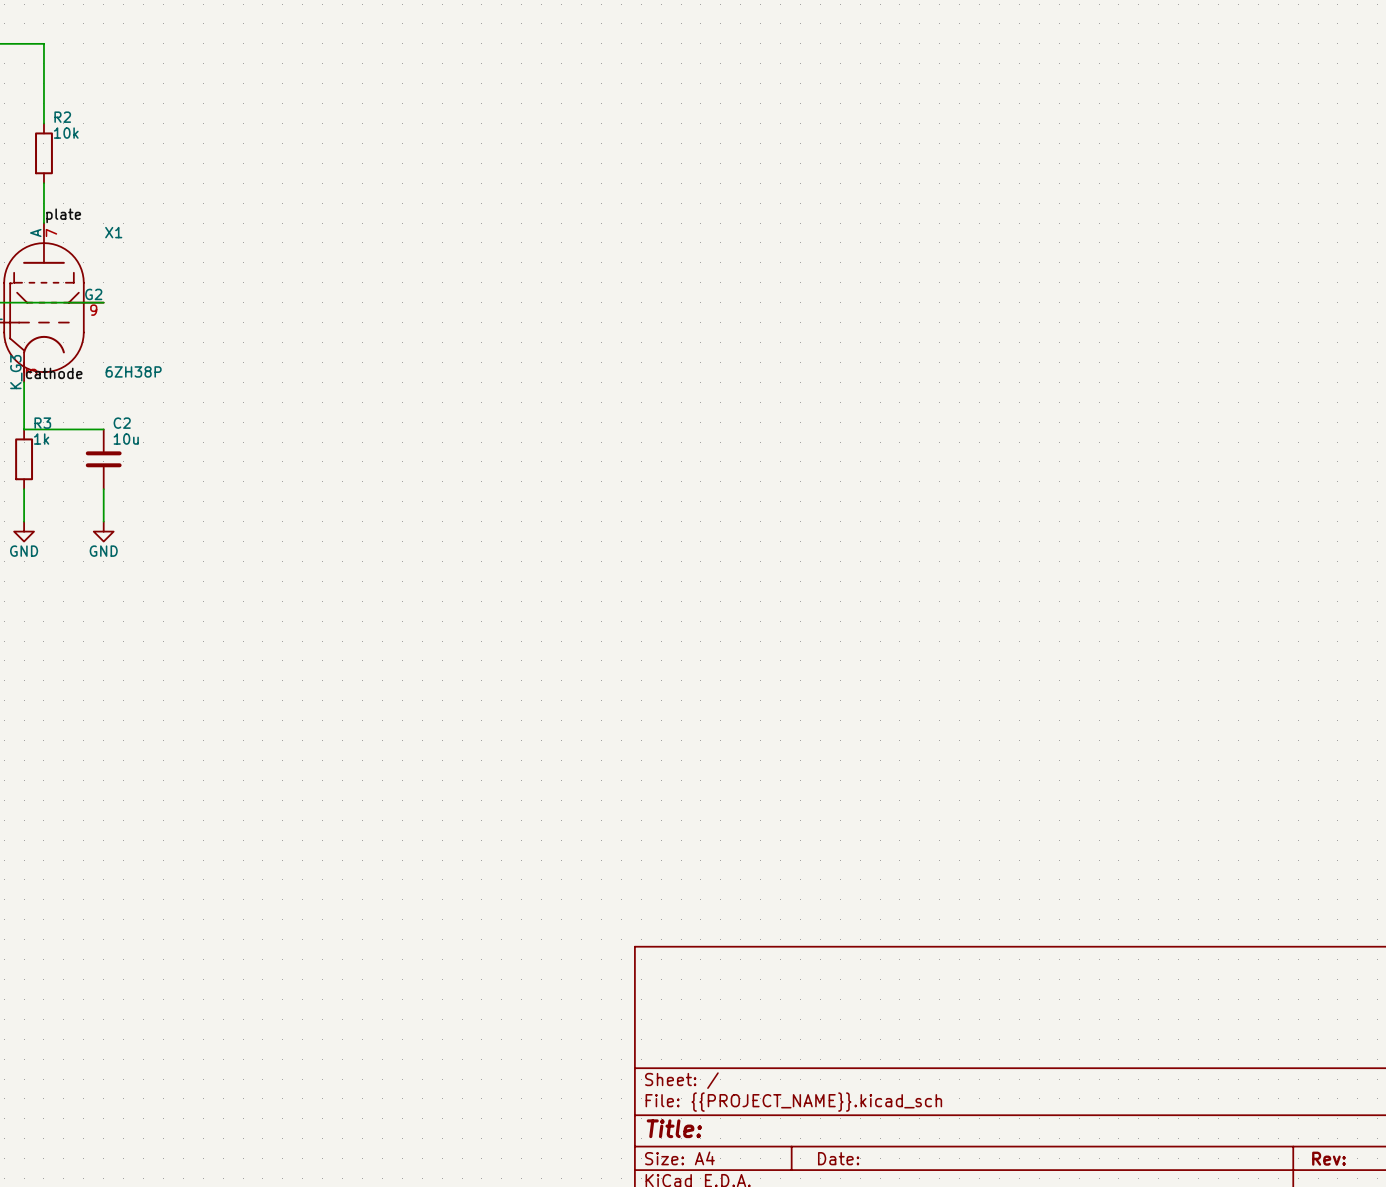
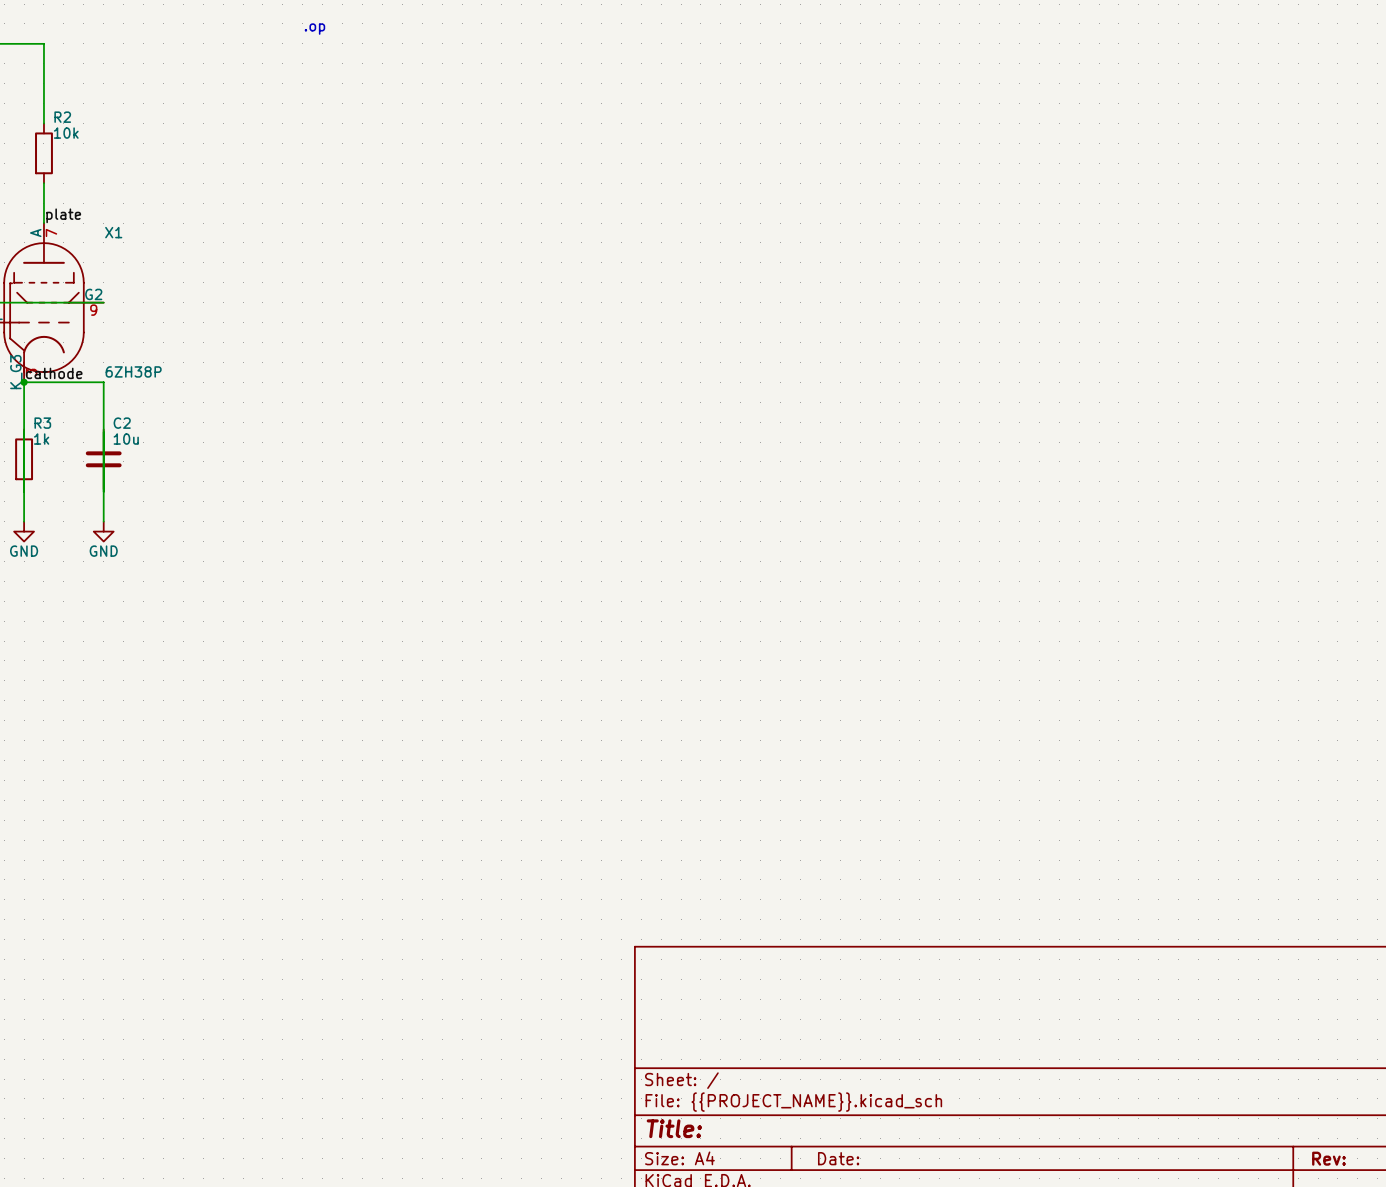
text: none -> .op (314, 29)
wire: none -> (24, 382) (103, 382) (103, 489)
junction: none -> (24, 382)
wire: (24, 429) (103, 429) -> (24, 429) (24, 489)

